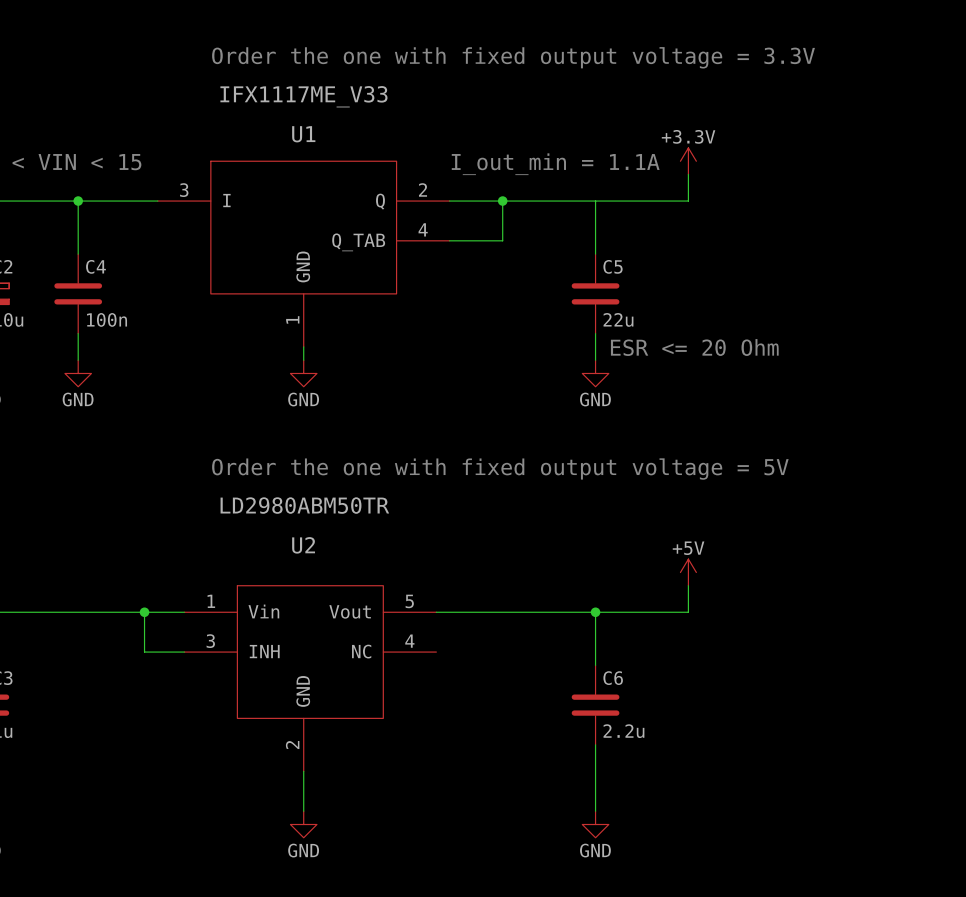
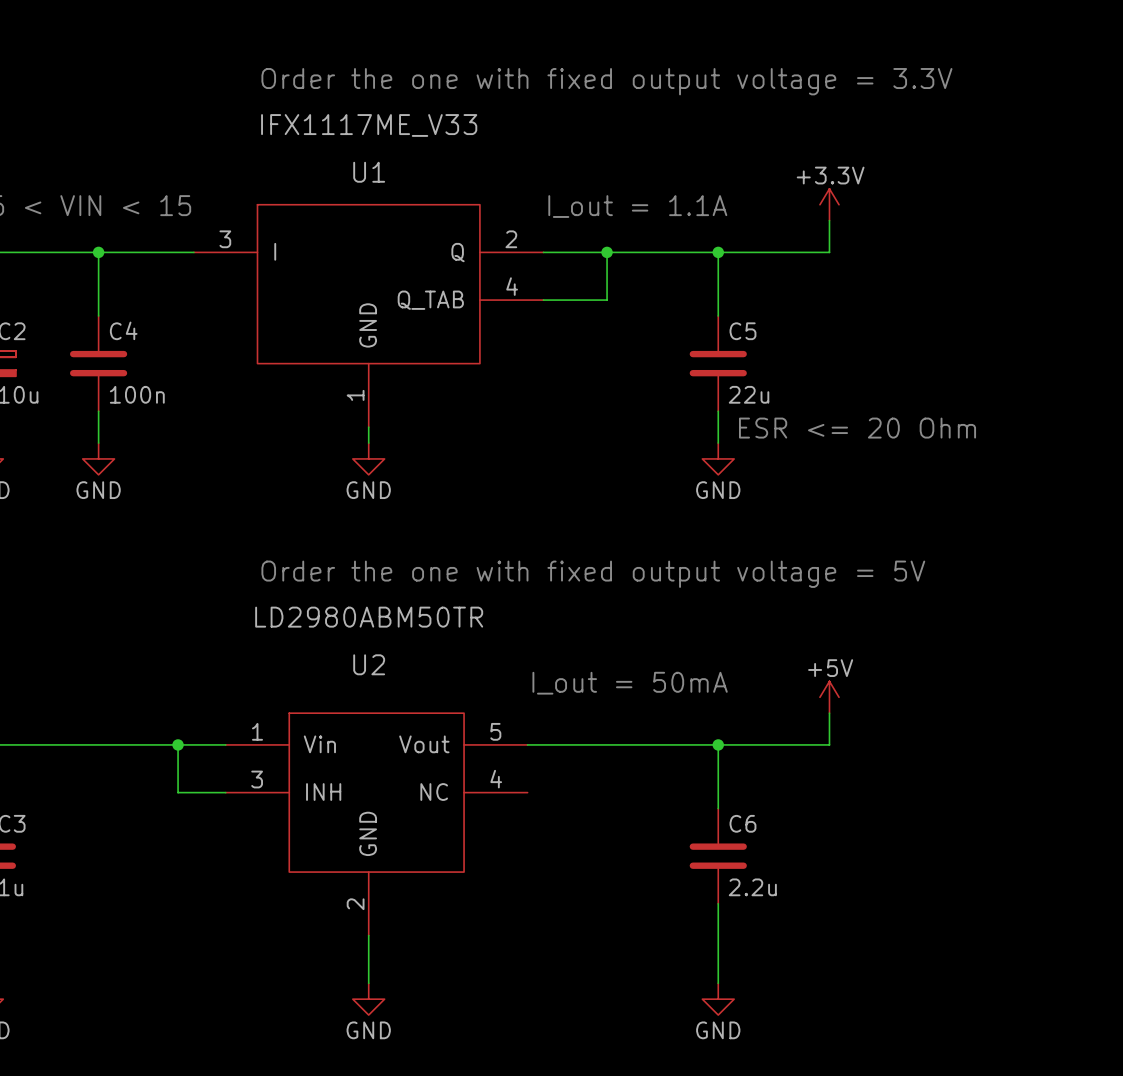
text: I_out_min = 1.1A (555, 164) -> I_out = 1.1A (637, 206)
junction: none -> (718, 252)
text: none -> I_out = 50mA (630, 683)

